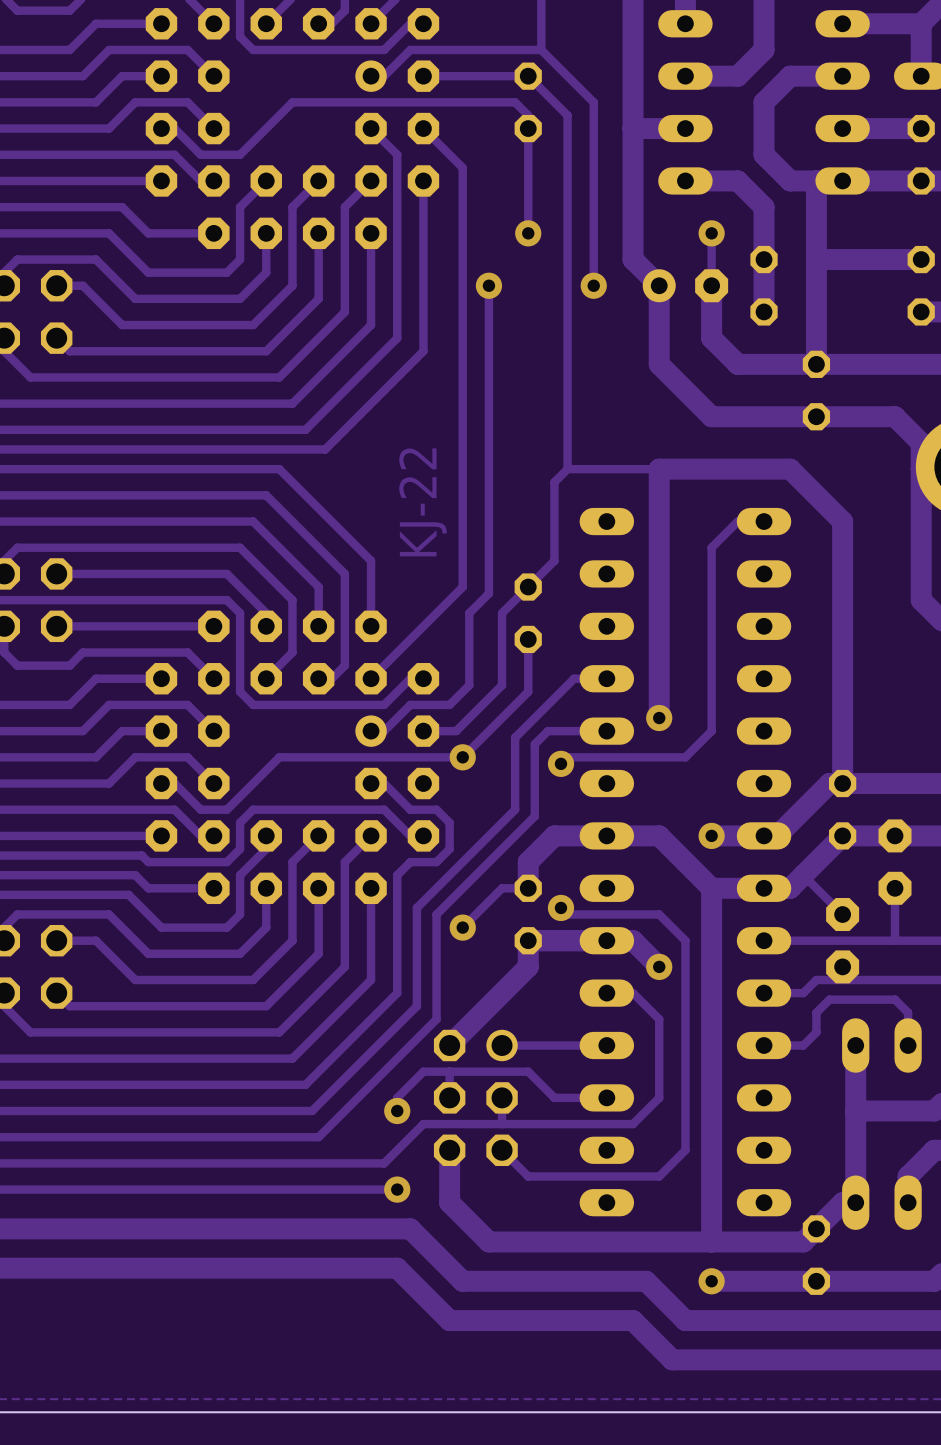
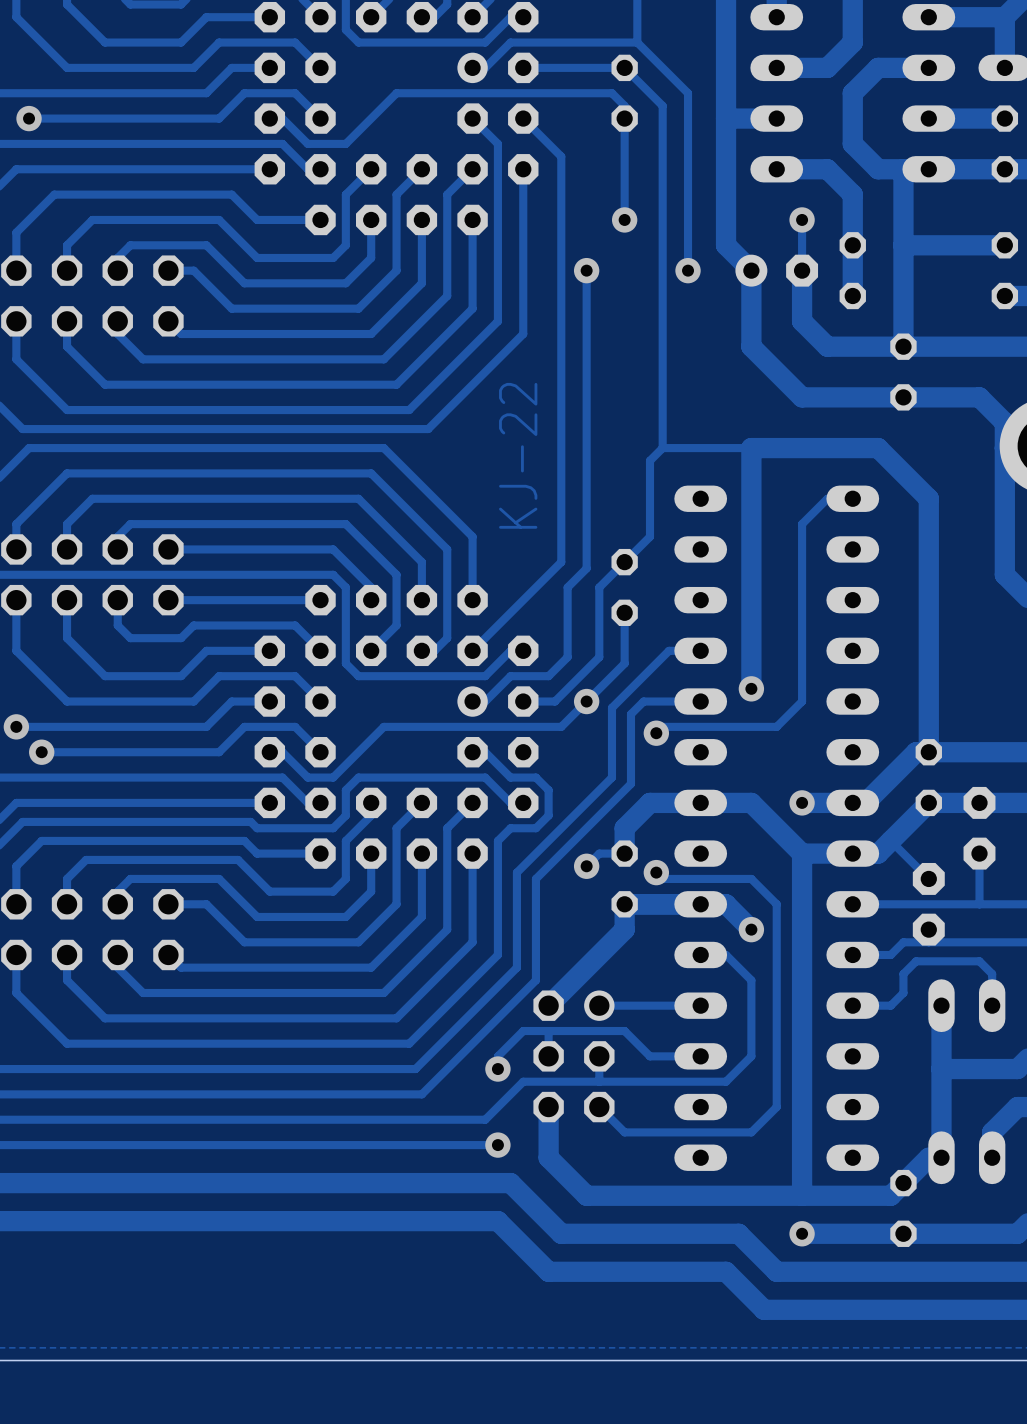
via position: (462, 757) -> (586, 701)
track: (488, 901) (462, 927) -> none
via position: (462, 927) -> (586, 866)

